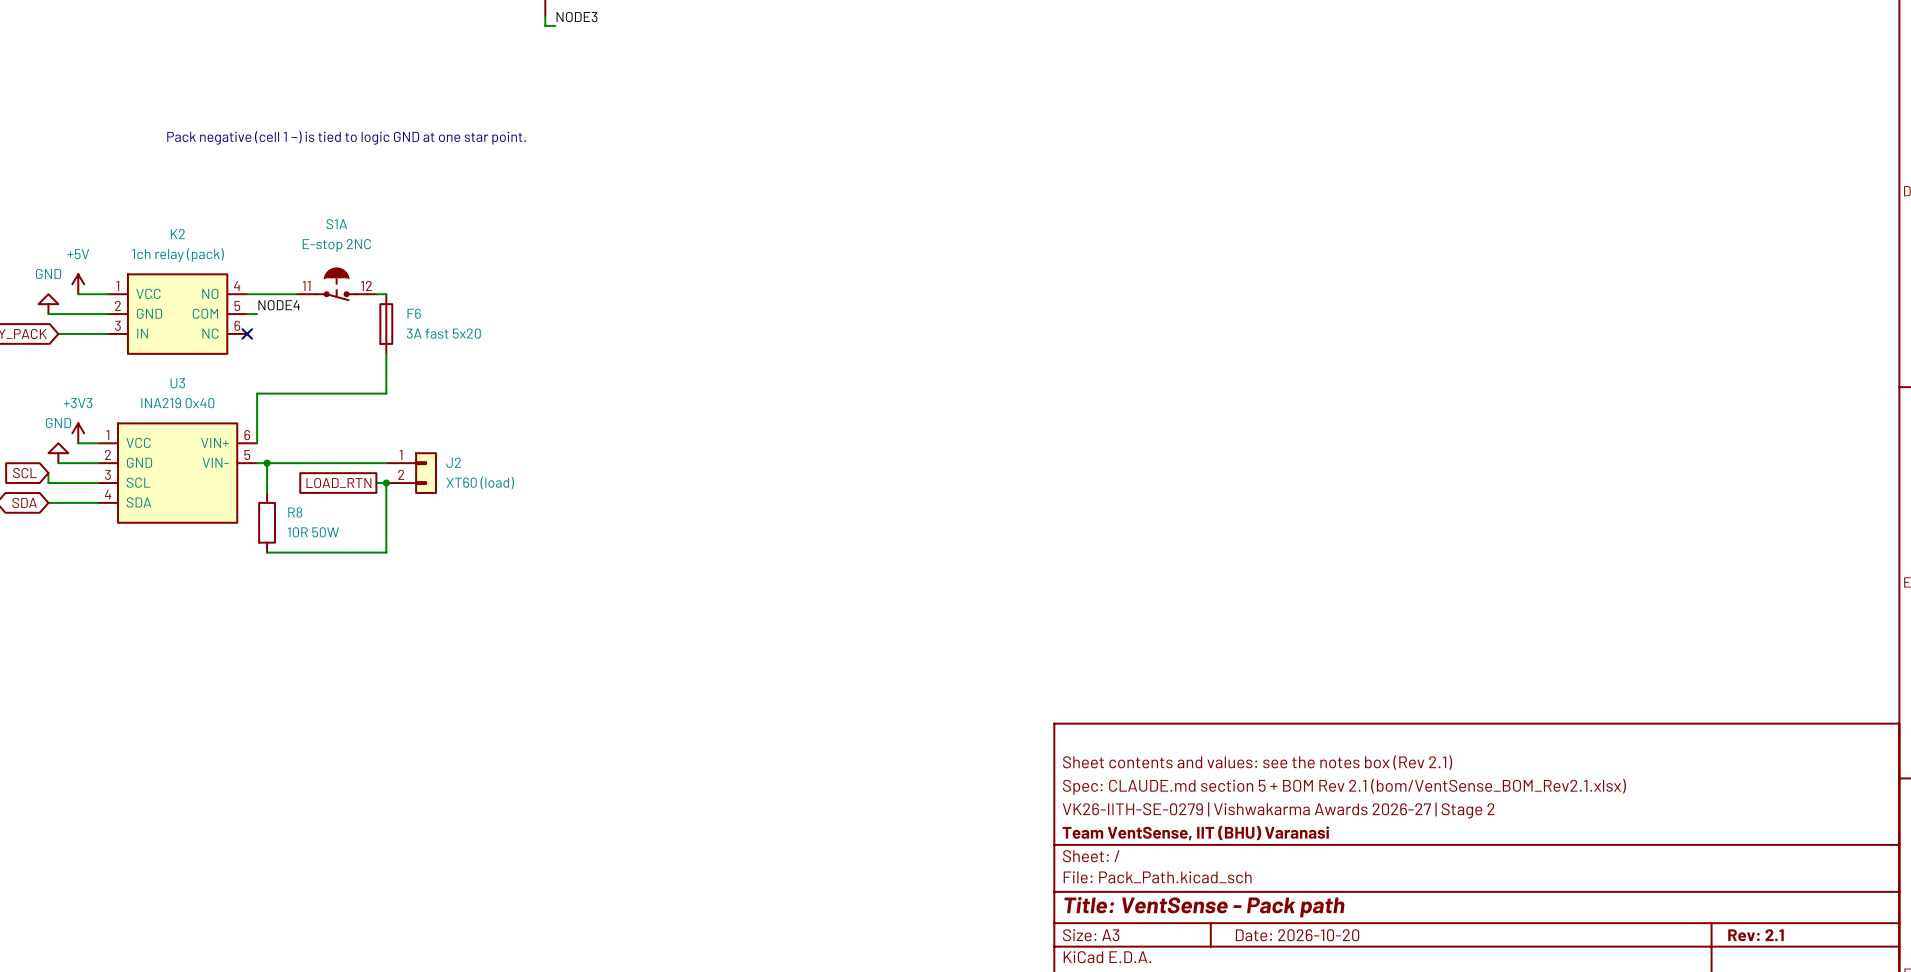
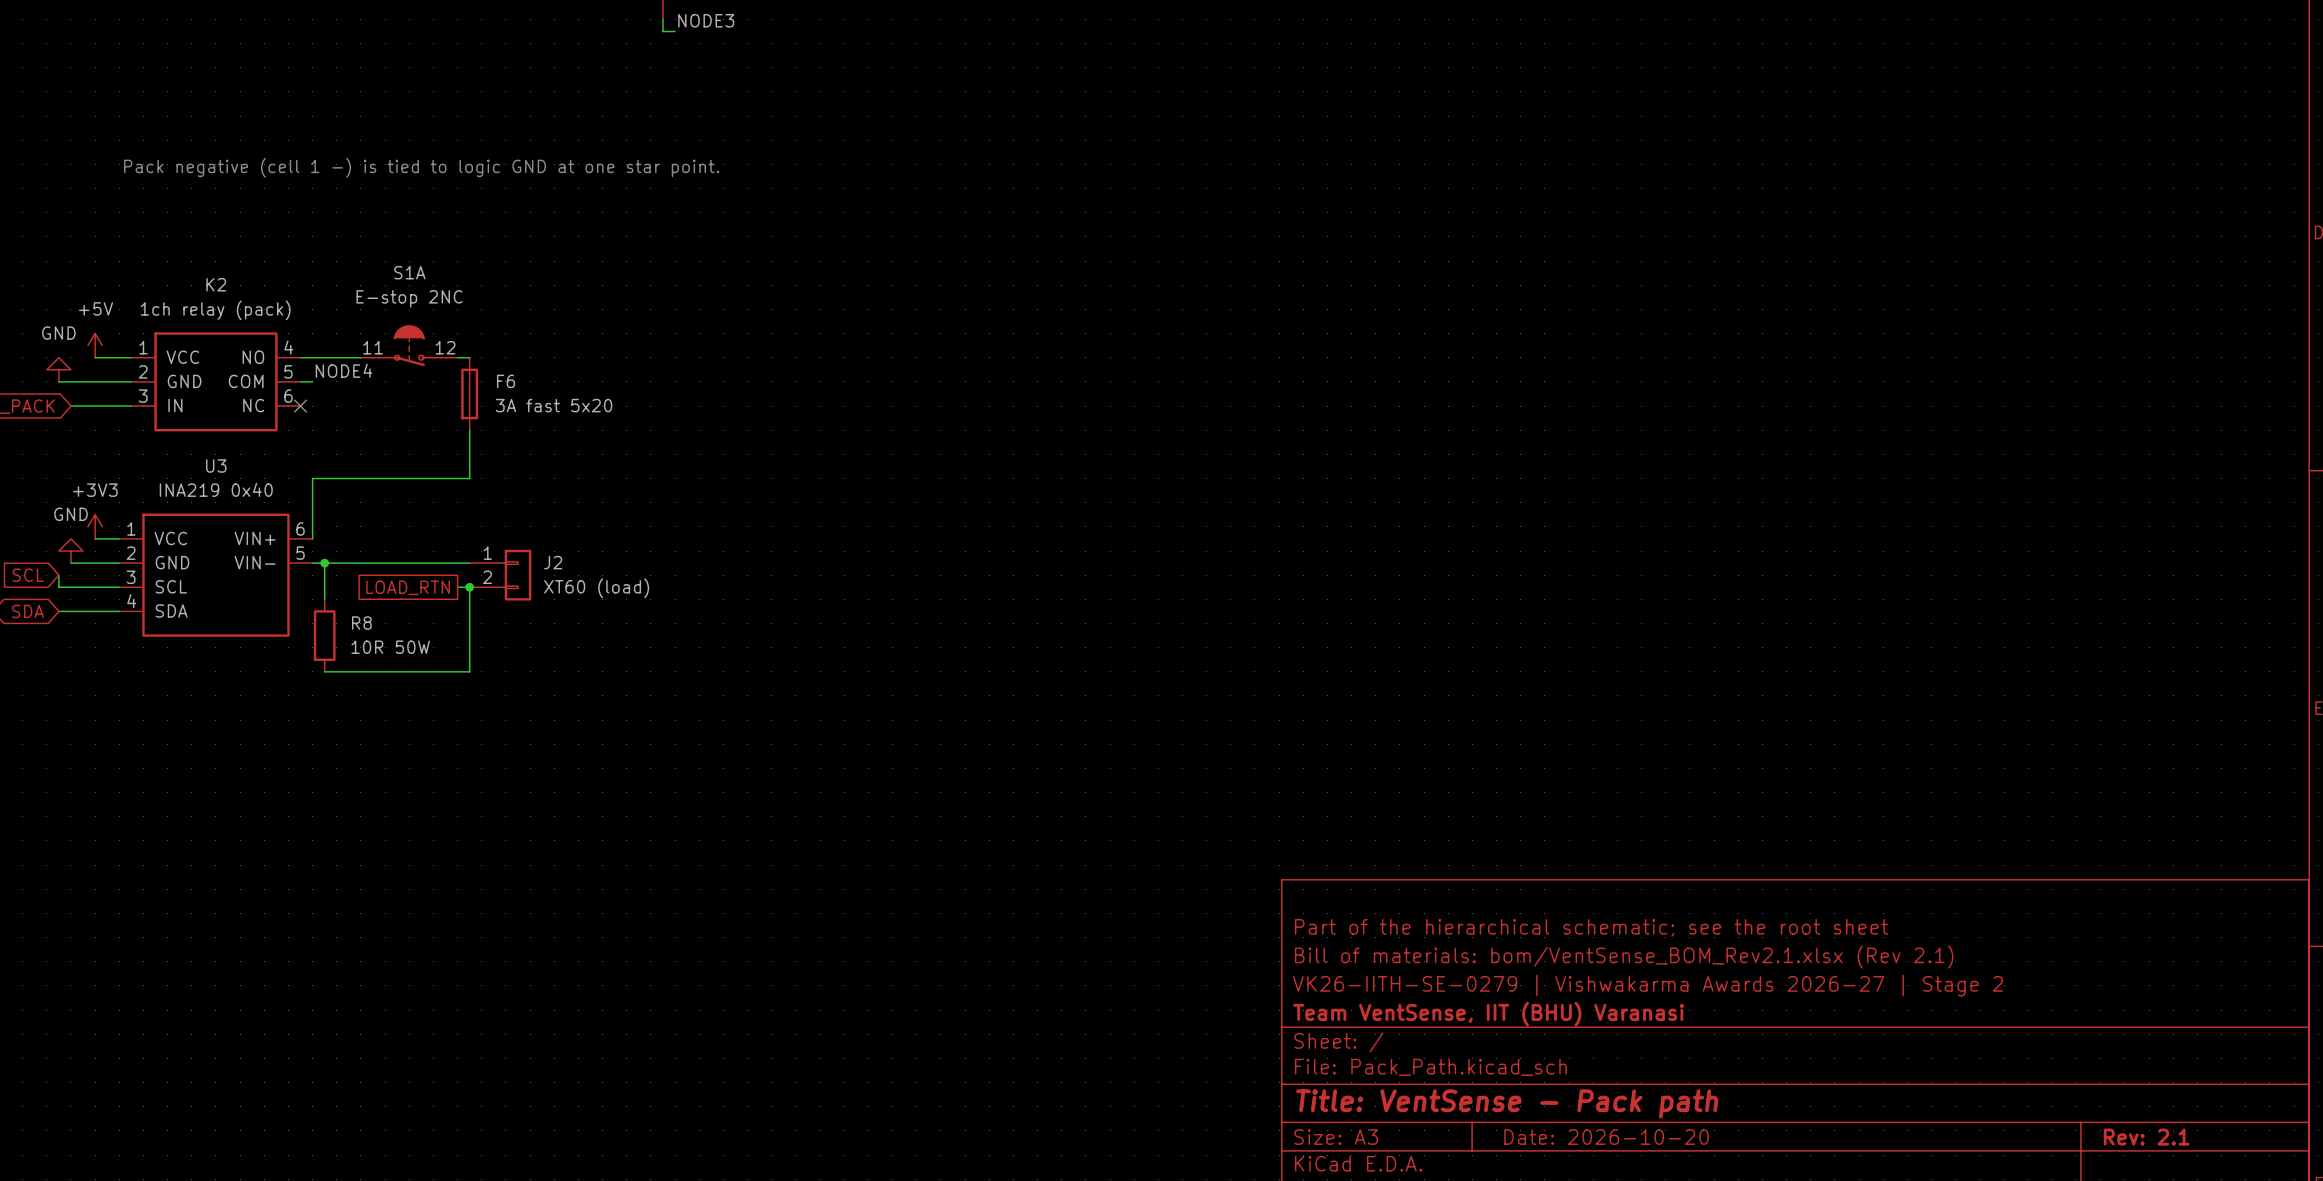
title block: Sheet contents and values: see the notes box (Rev 2.1) (1257, 762) -> Part of the hierarchical schematic; see the root sheet (1591, 927)
title block: Spec: CLAUDE.md section 5 + BOM Rev 2.1 (bom/VentSense_BOM_Rev2.1.xlsx) (1344, 786) -> Bill of materials: bom/VentSense_BOM_Rev2.1.xlsx (Rev 2.1) (1624, 957)

